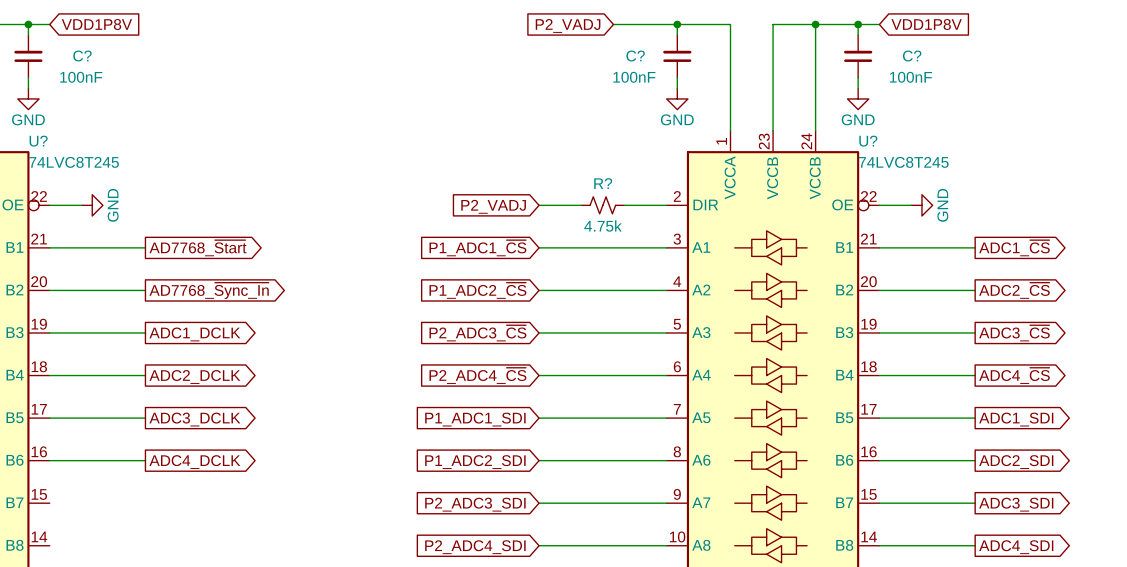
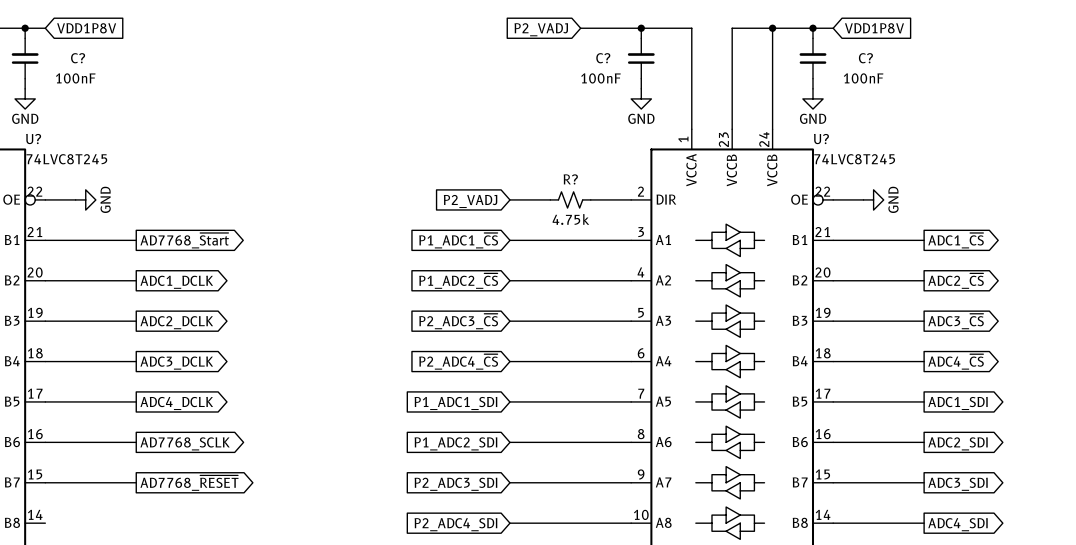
global label: AD7768_~{Sync_In} (209, 290) -> ADC1_DCLK (176, 282)
global label: ADC1_DCLK (194, 334) -> ADC2_DCLK (176, 322)
global label: ADC2_DCLK (194, 377) -> ADC3_DCLK (176, 363)
global label: ADC3_DCLK (194, 419) -> ADC4_DCLK (176, 403)
global label: ADC4_DCLK (194, 462) -> AD7768_SCLK (185, 443)
wire: none -> (45, 482) (136, 482)
global label: none -> AD7768_~{RESET} (189, 483)

